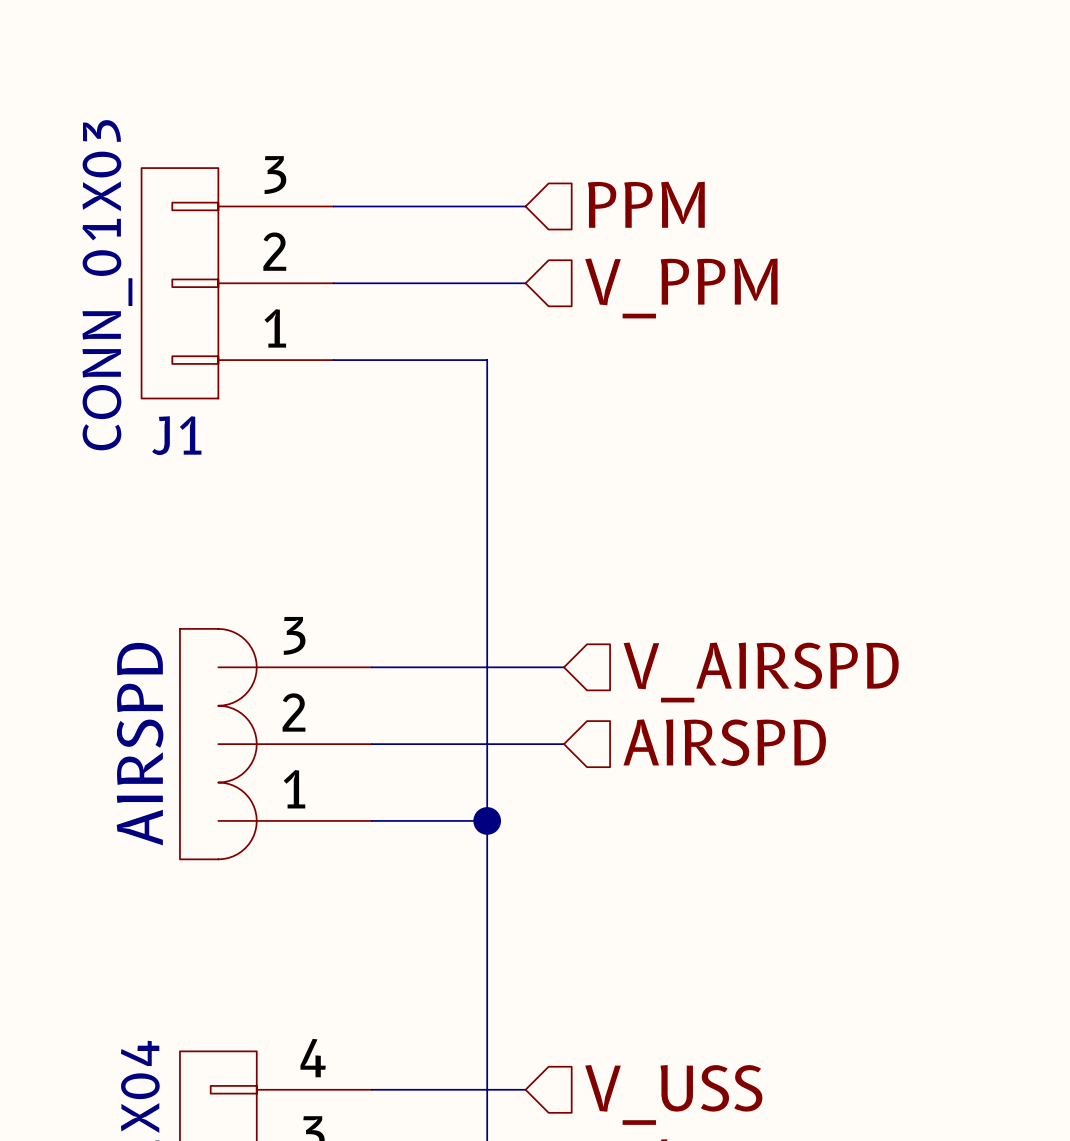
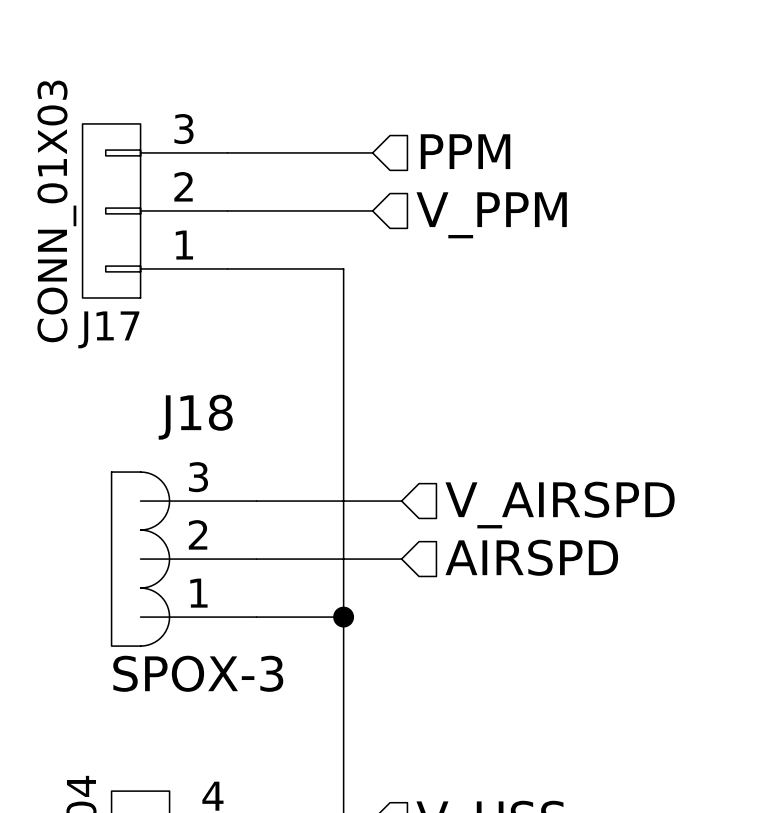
J1 name: J1 (176, 435) -> J17 (108, 329)
J18 name: none -> J18 (195, 417)
J18 value: AIRSPD (140, 744) -> SPOX-3 (198, 673)

